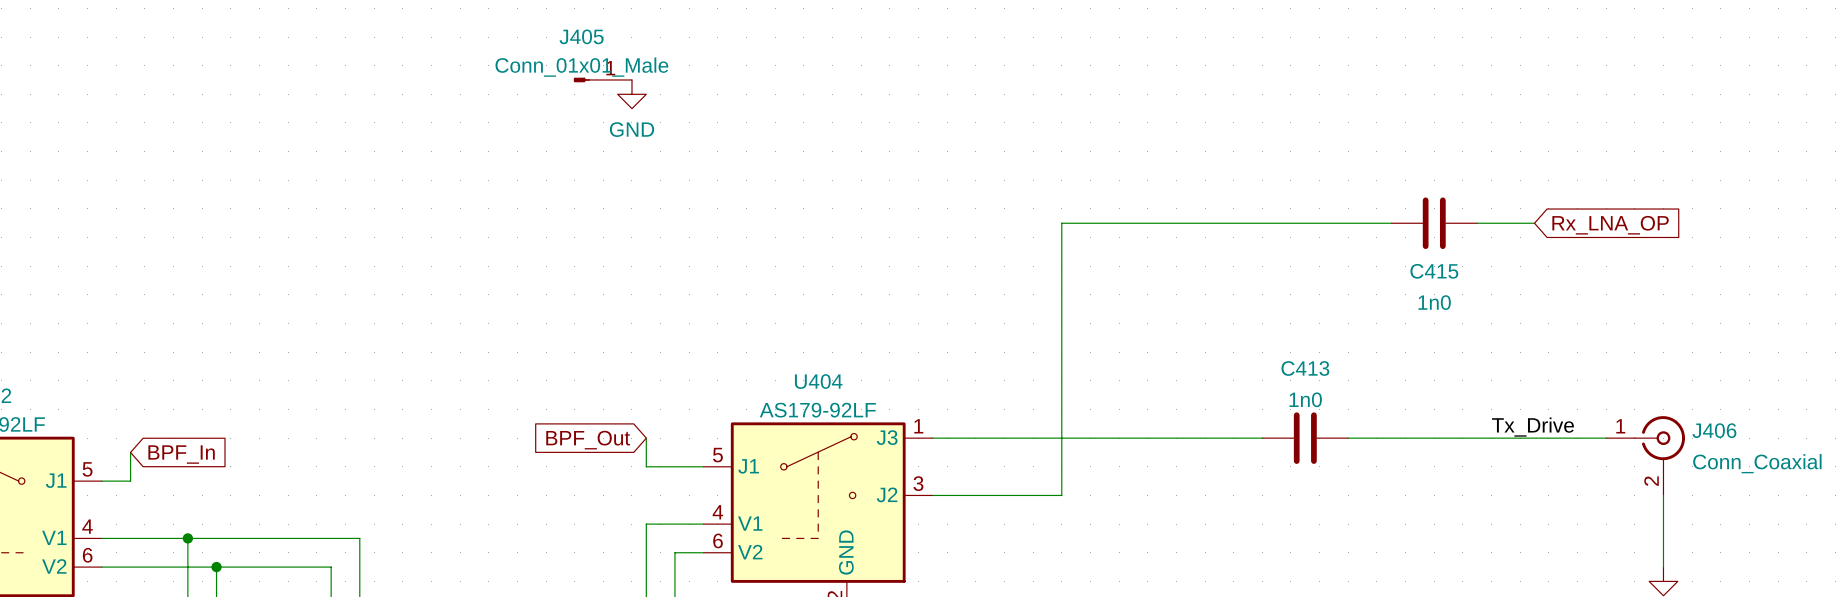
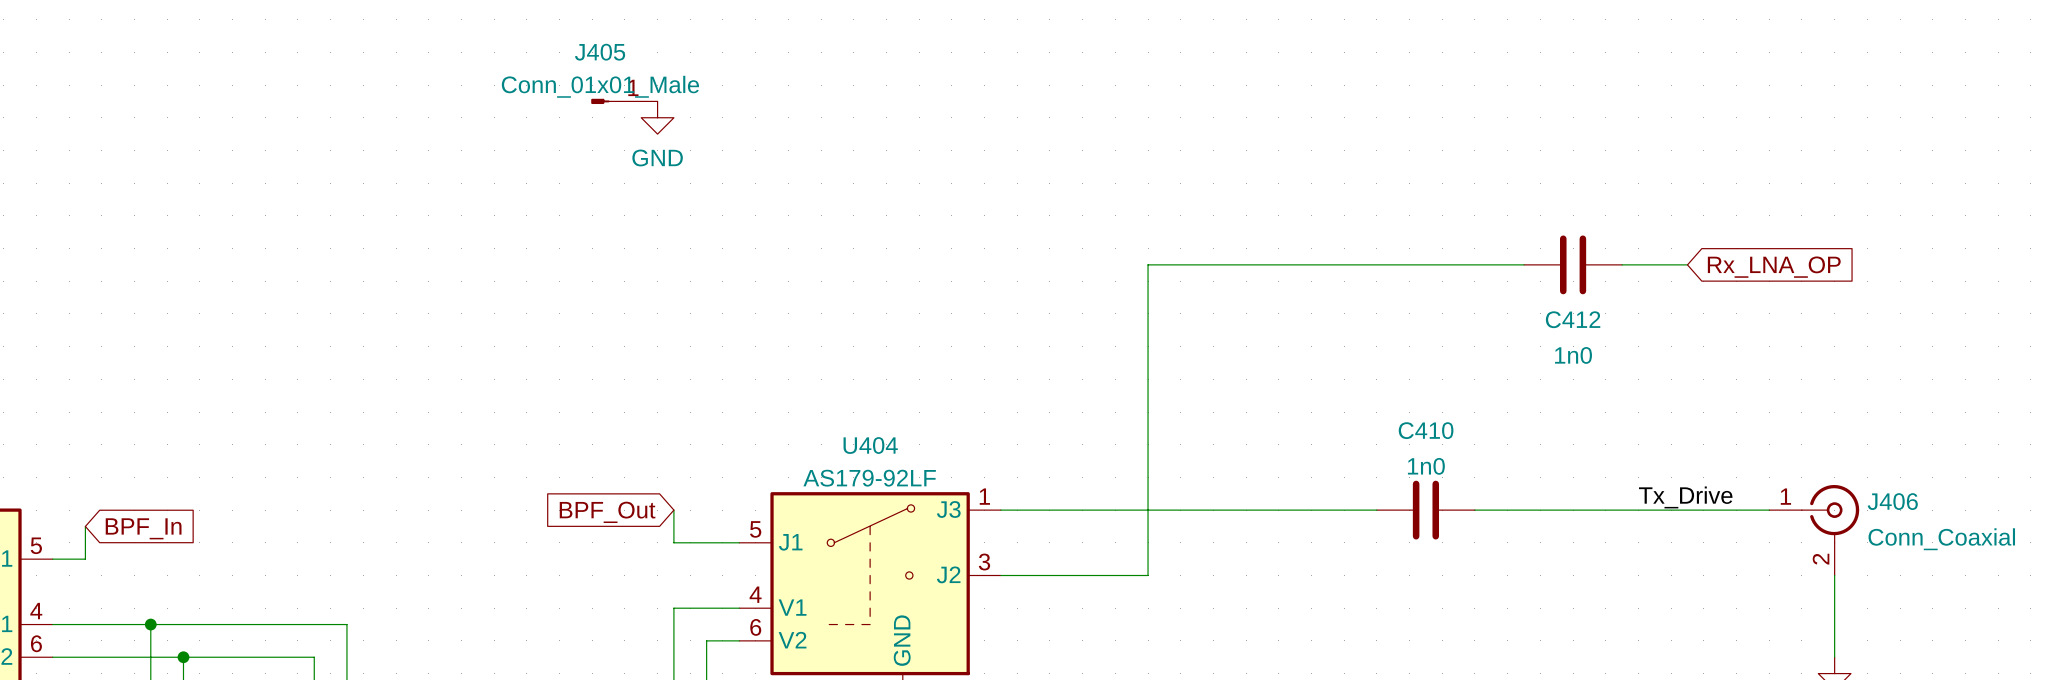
C415 name: C415 (1434, 271) -> C412 (1573, 319)
C413 name: C413 (1305, 368) -> C410 (1426, 430)

